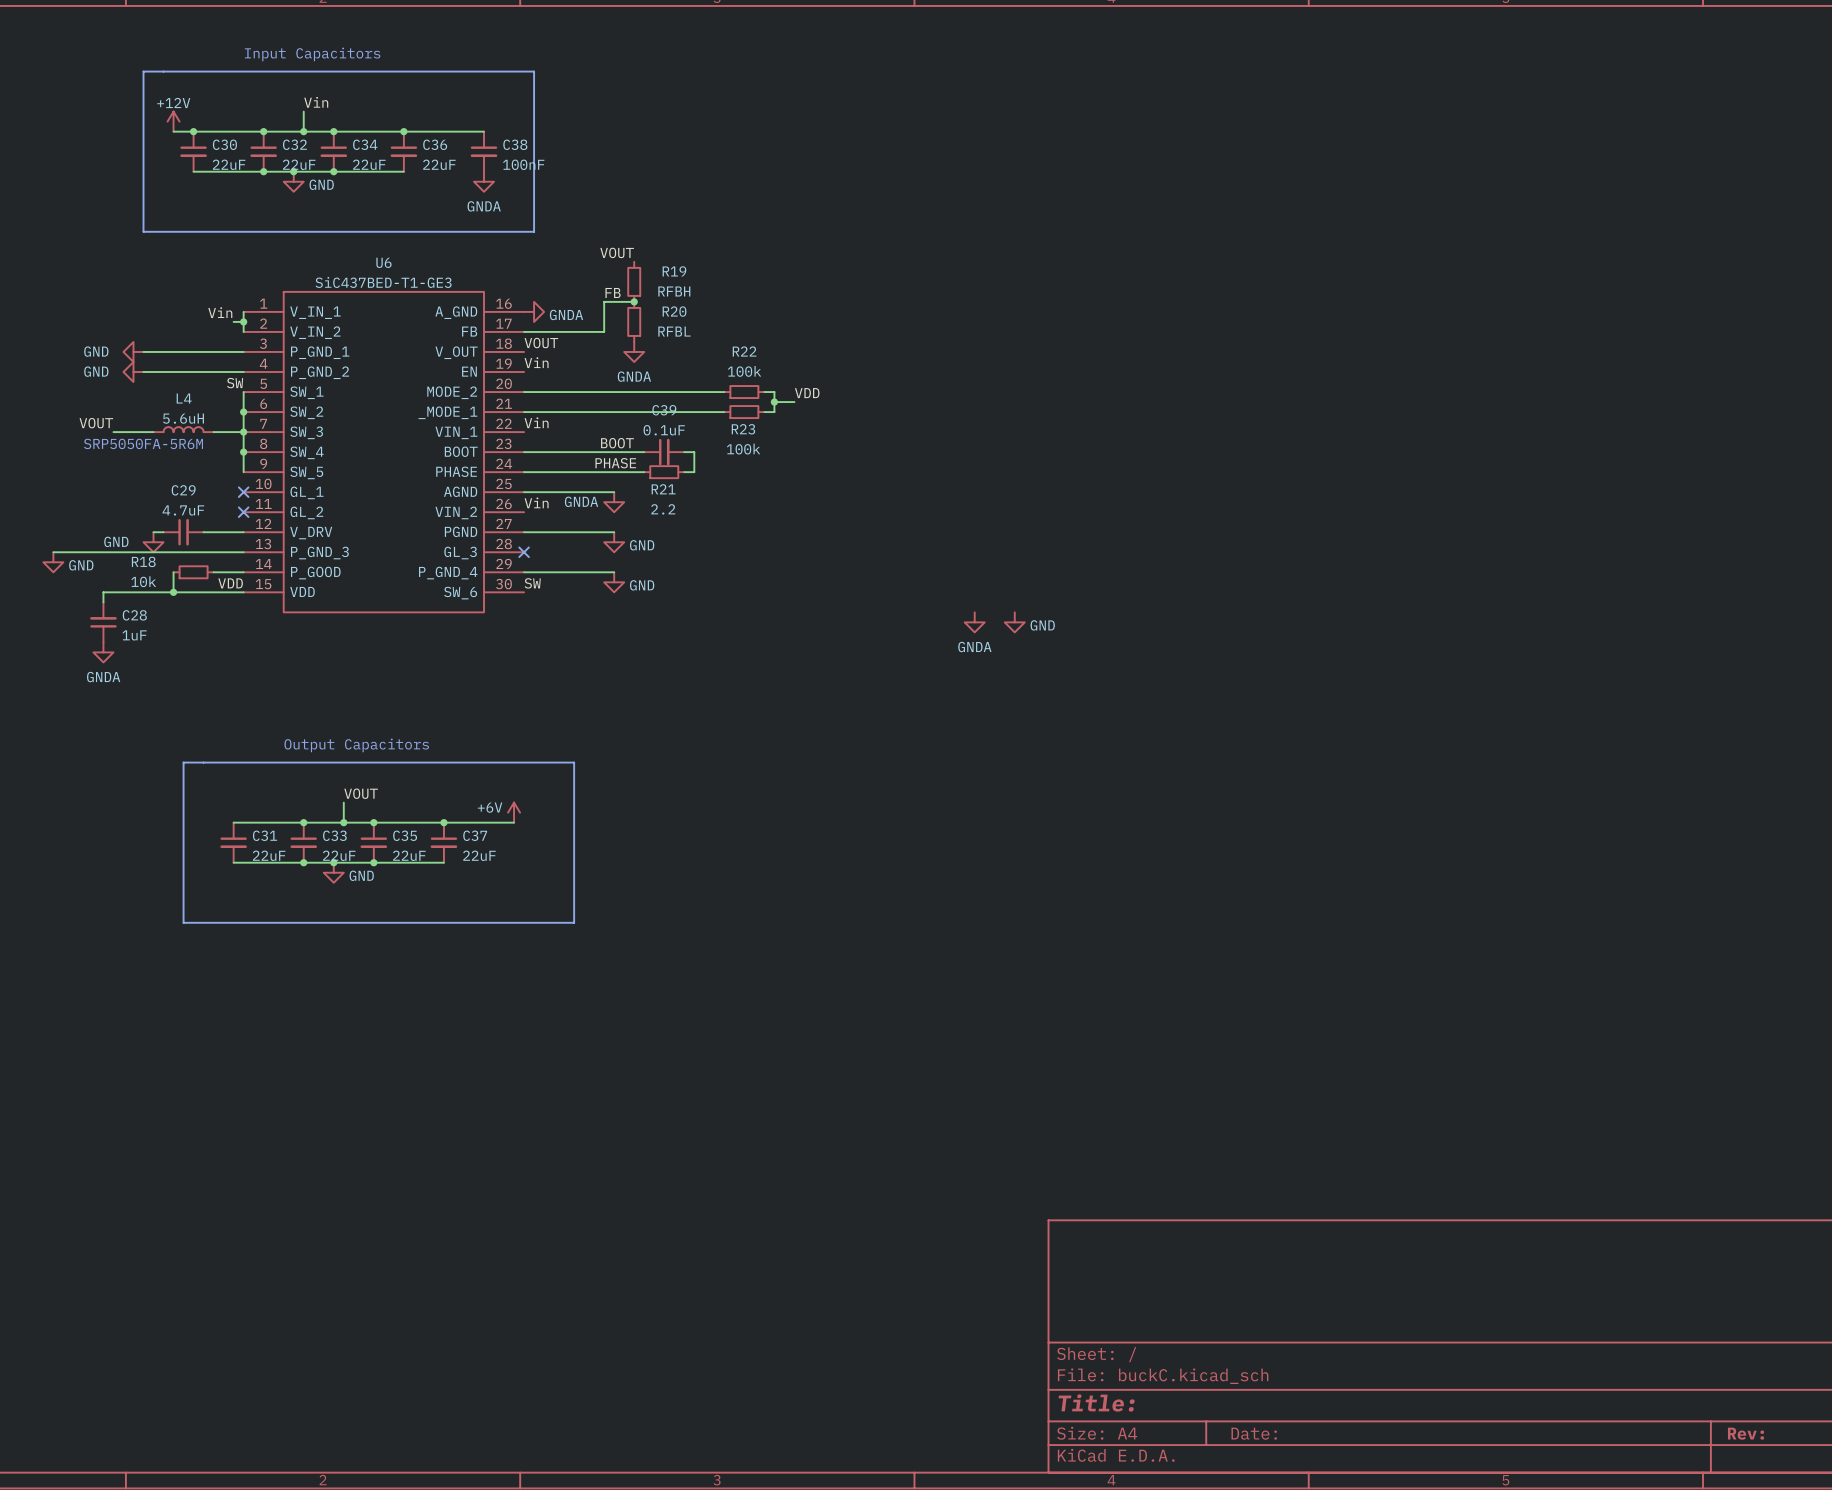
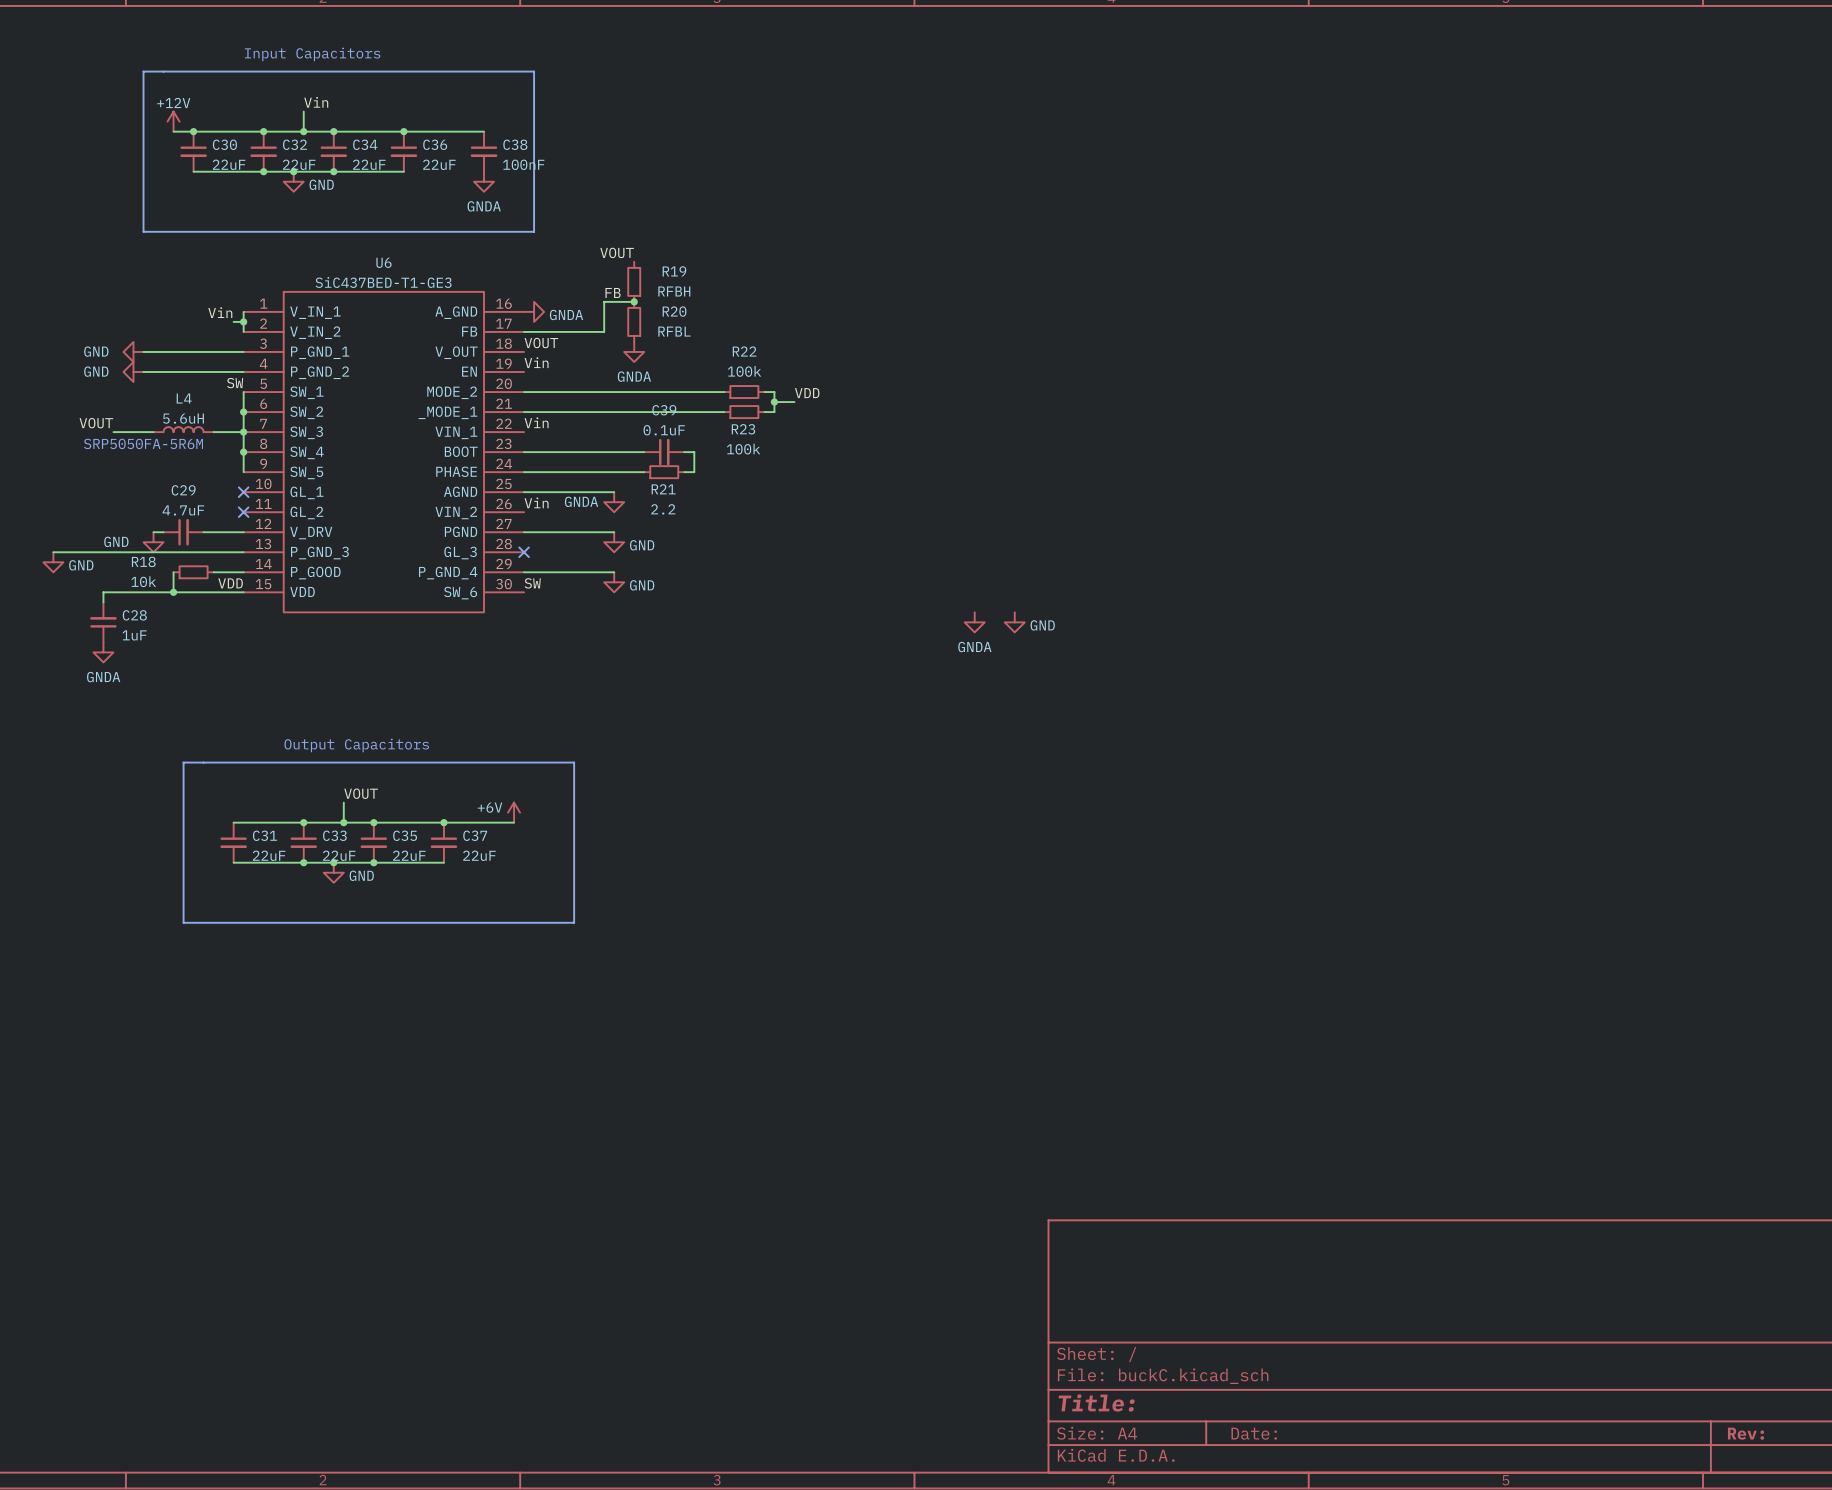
label: BOOT (617, 443) -> none
label: PHASE (615, 463) -> none

